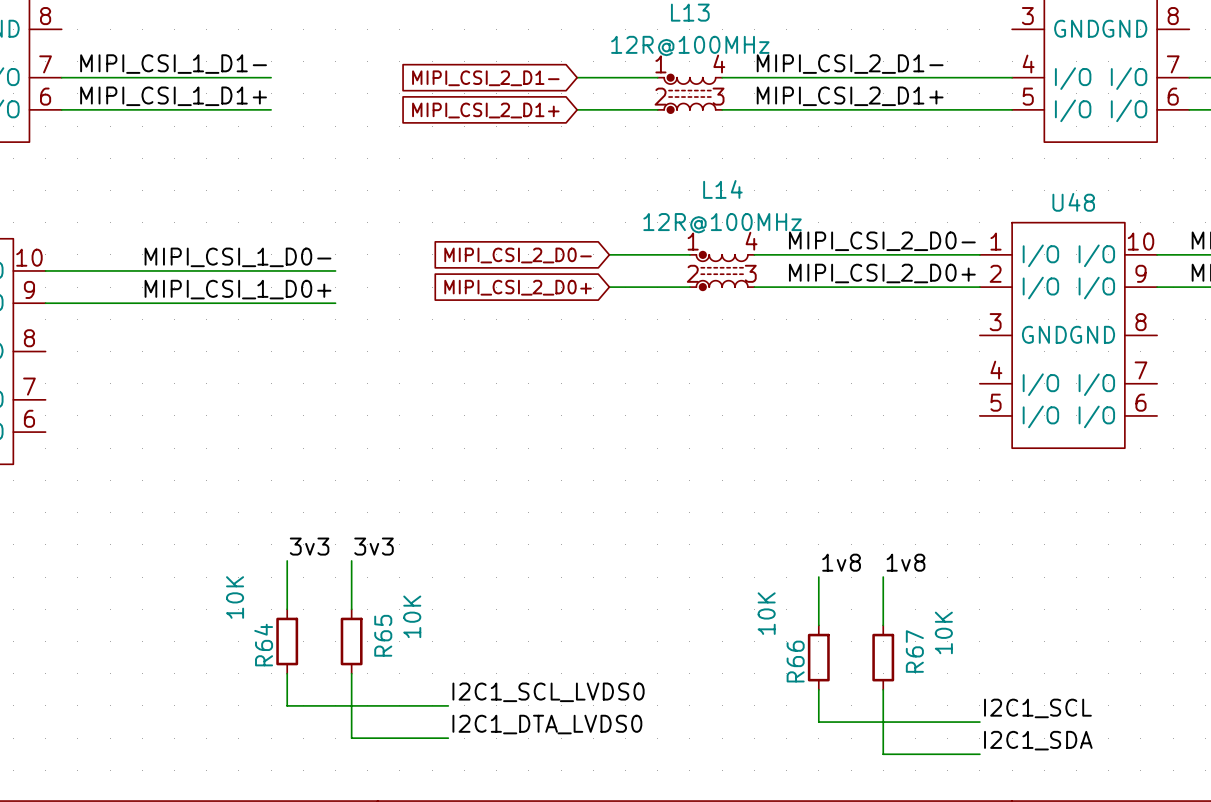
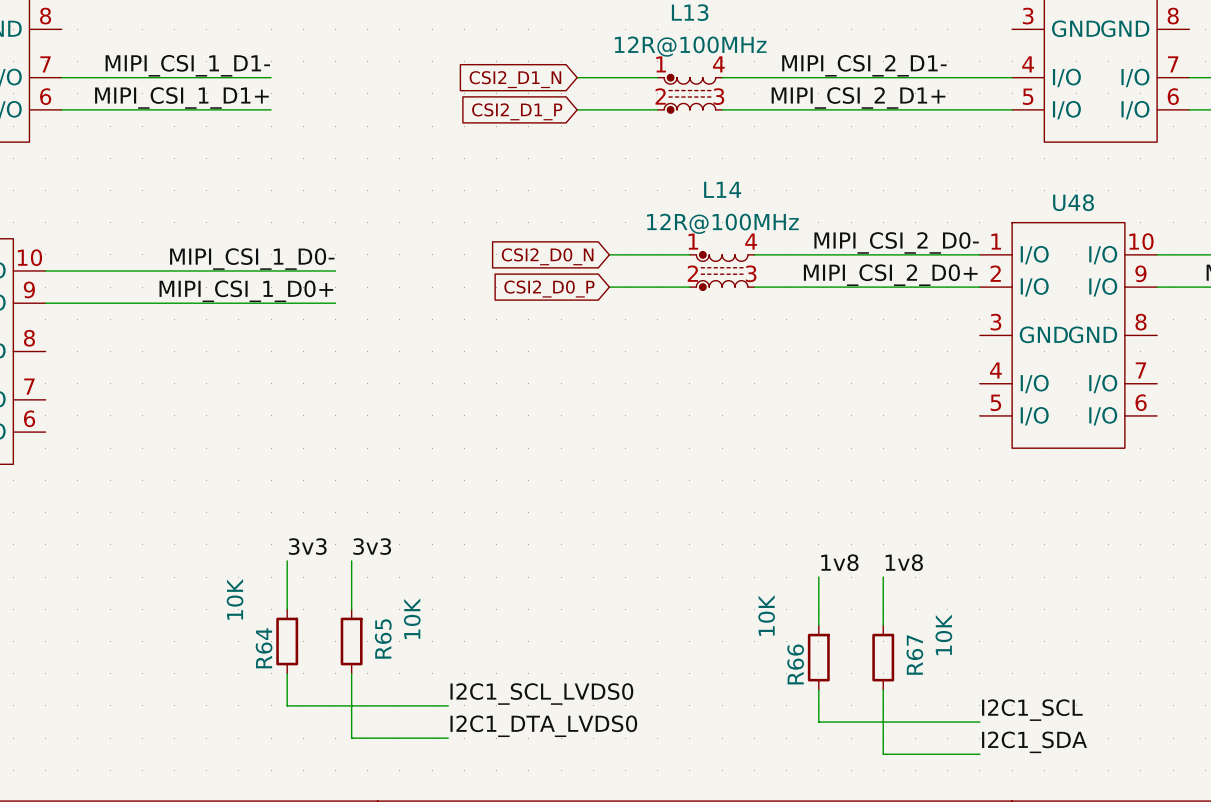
global label: MIPI_CSI_2_D1- (485, 78) -> CSI2_D1_N (515, 79)
global label: MIPI_CSI_2_D1+ (485, 110) -> CSI2_D1_P (517, 111)
global label: MIPI_CSI_2_D0- (518, 255) -> CSI2_D0_N (547, 256)
global label: MIPI_CSI_2_D0+ (518, 287) -> CSI2_D0_P (549, 289)

